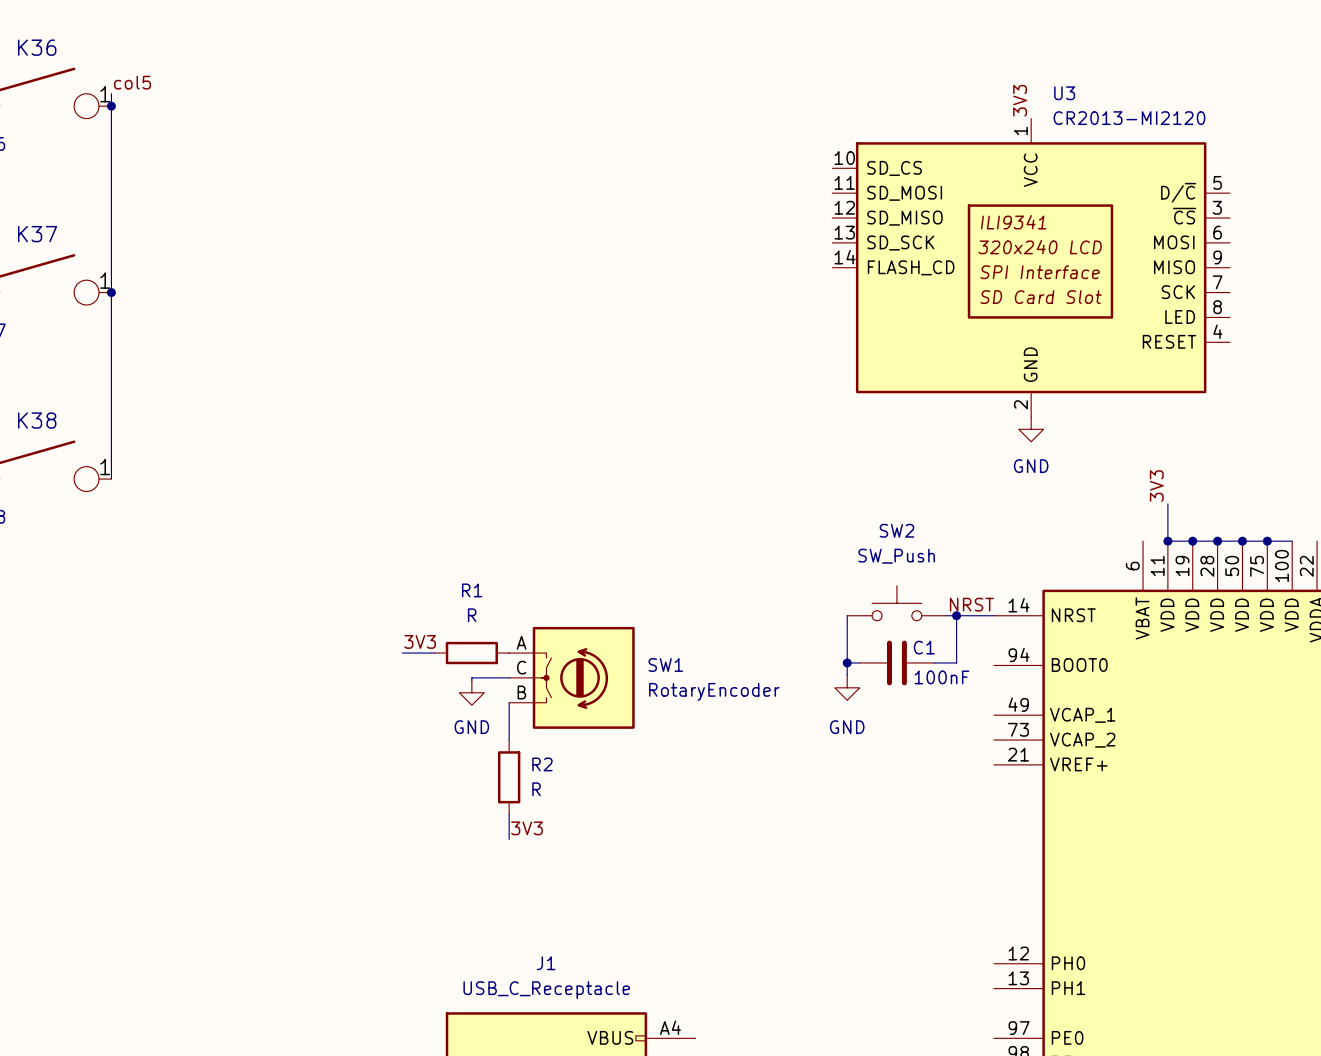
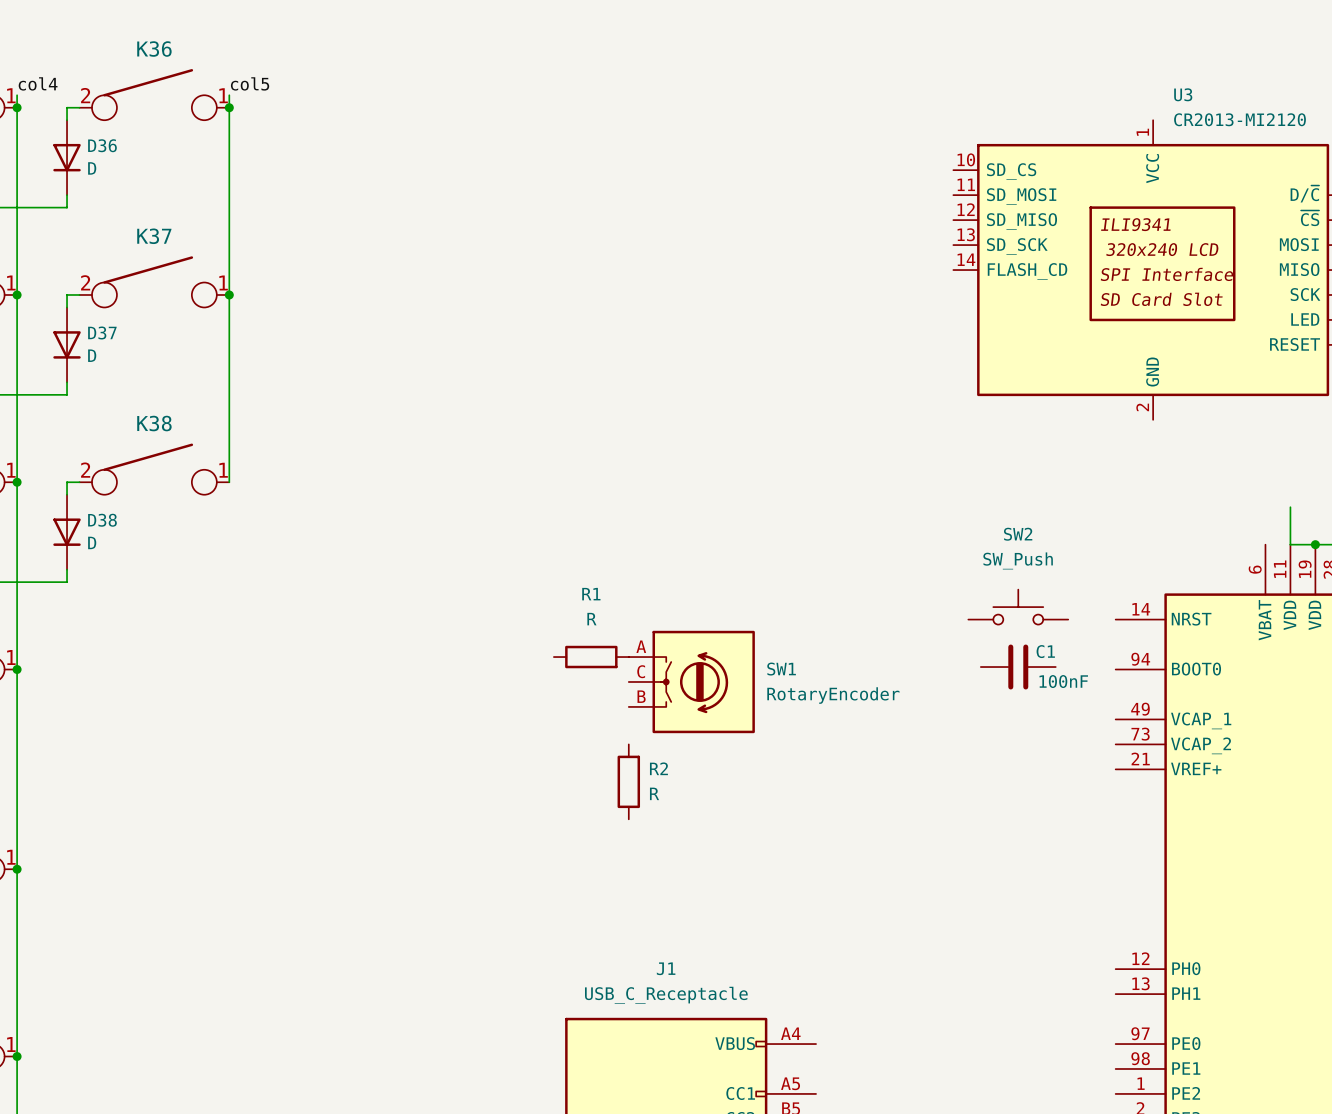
label: 3V3 (1020, 100) -> none
power symbol: GND (1031, 429) -> none
label: 3V3 (1156, 486) -> none
junction: (1167, 541) -> none
label: NRST (971, 604) -> none
wire: (847, 615) (847, 675) -> none
wire: (946, 615) (993, 615) -> none
wire: (956, 615) (956, 662) (934, 662) -> none
junction: (956, 615) -> none
label: 3V3 (420, 641) -> none
wire: (402, 653) (434, 653) -> none
wire: (847, 662) (859, 662) -> none
junction: (847, 662) -> none
wire: (509, 677) (471, 677) (471, 680) -> none
power symbol: GND (847, 687) -> none
power symbol: GND (471, 692) -> none
wire: (509, 702) (509, 740) -> none
wire: (509, 814) (509, 839) -> none
label: 3V3 (527, 828) -> none

